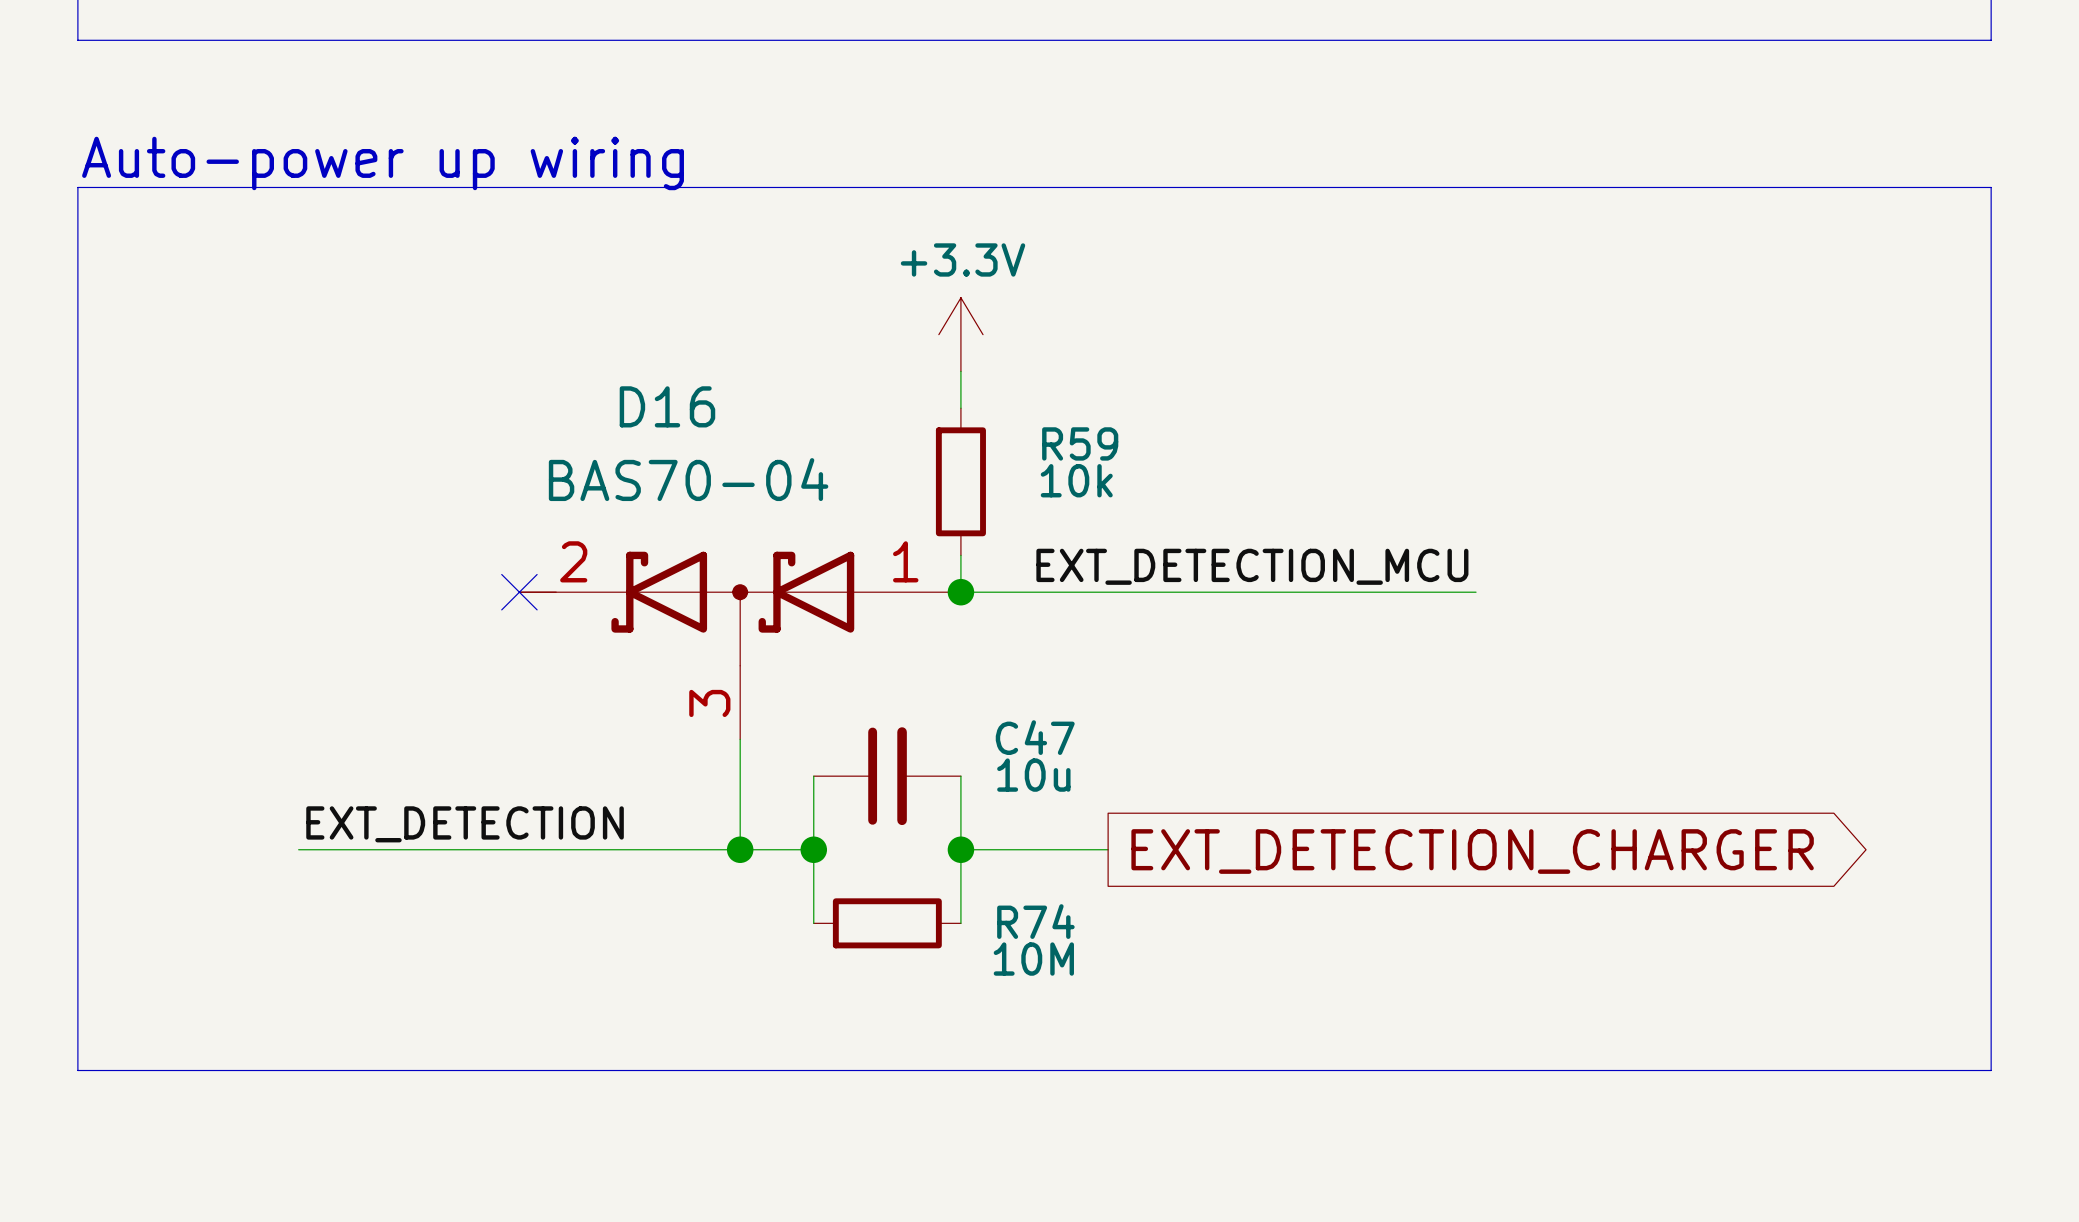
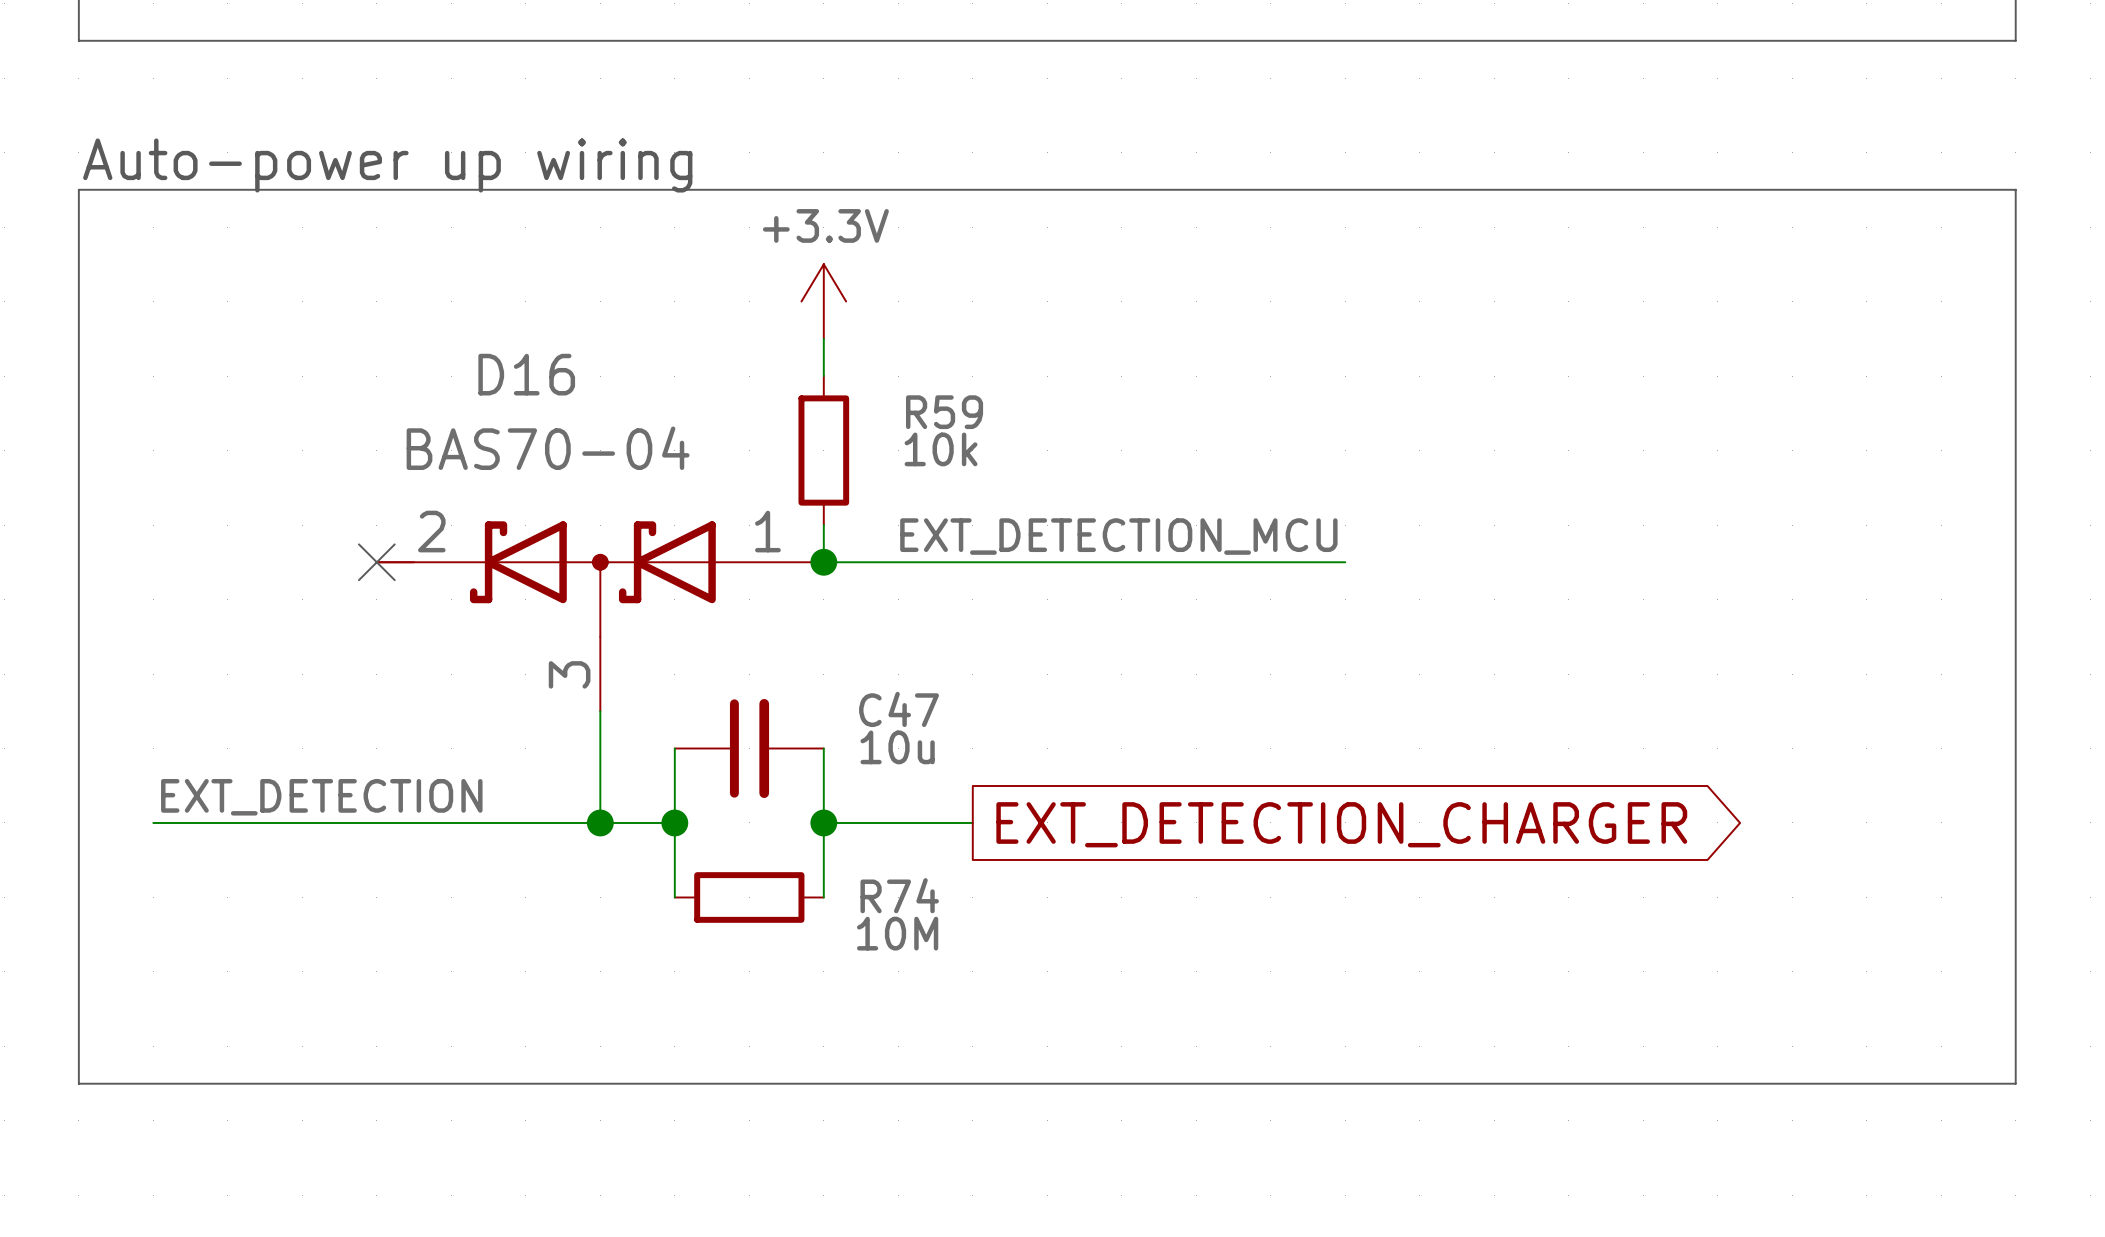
power symbol position: +3.3V (960, 334) -> +3.3V (823, 301)
wire: (960, 371) (960, 408) -> (823, 338) (823, 376)
R59 position: (960, 481) -> (823, 450)
junction: none -> (823, 562)
wire: (960, 555) (960, 592) (1476, 592) -> (823, 525) (823, 562) (1345, 562)
label position: EXT_DETECTION_MCU (1252, 566) -> EXT_DETECTION_MCU (1118, 536)
no-connect mark position: (519, 592) -> (376, 562)
junction: (960, 592) -> none
D16 position: (740, 645) -> (600, 616)
wire: (740, 739) (740, 849) -> (600, 711) (600, 822)
C47 position: (887, 776) -> (749, 748)
wire: (960, 776) (960, 923) -> (674, 748) (674, 897)
junction: none -> (600, 822)
junction: none -> (674, 822)
label position: EXT_DETECTION (465, 824) -> EXT_DETECTION (321, 797)
wire: (298, 849) (813, 849) -> (153, 822) (674, 822)
junction: (740, 849) -> none
junction position: (813, 849) -> (823, 822)
wire: (960, 849) (1108, 849) -> (823, 822) (972, 822)
junction: (960, 849) -> none
global label position: EXT_DETECTION_CHARGER (1472, 851) -> EXT_DETECTION_CHARGER (1341, 824)
wire: (813, 886) (813, 923) -> (823, 748) (823, 785)
R74 position: (887, 923) -> (749, 897)

